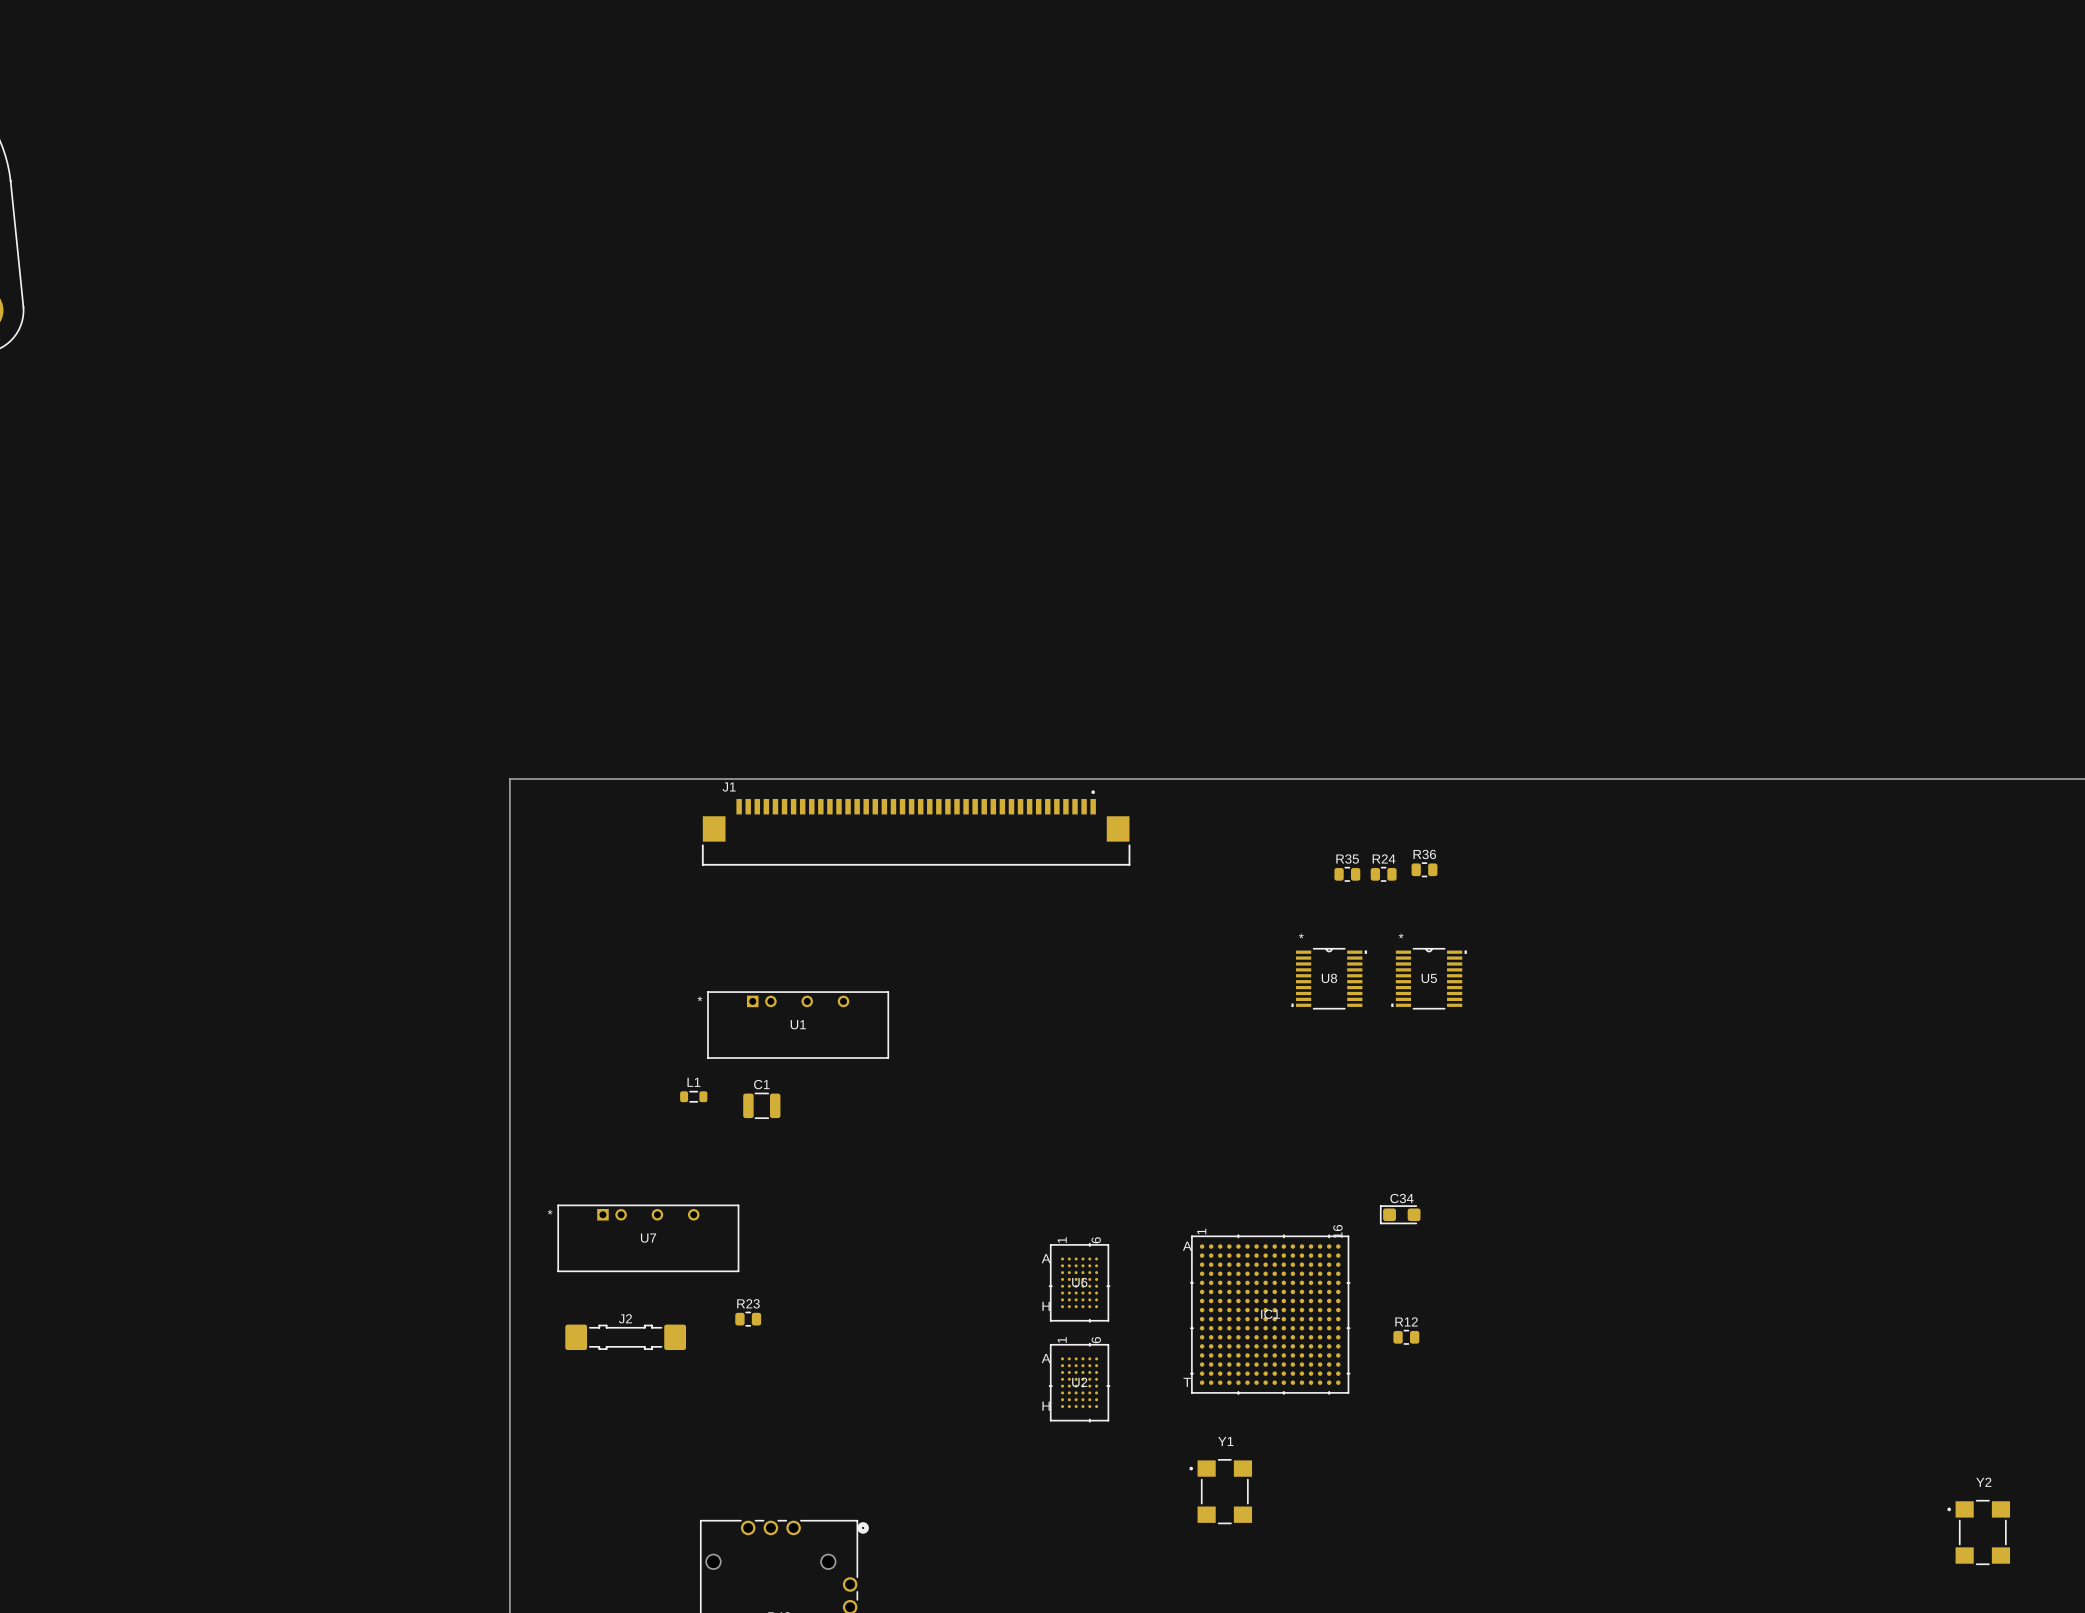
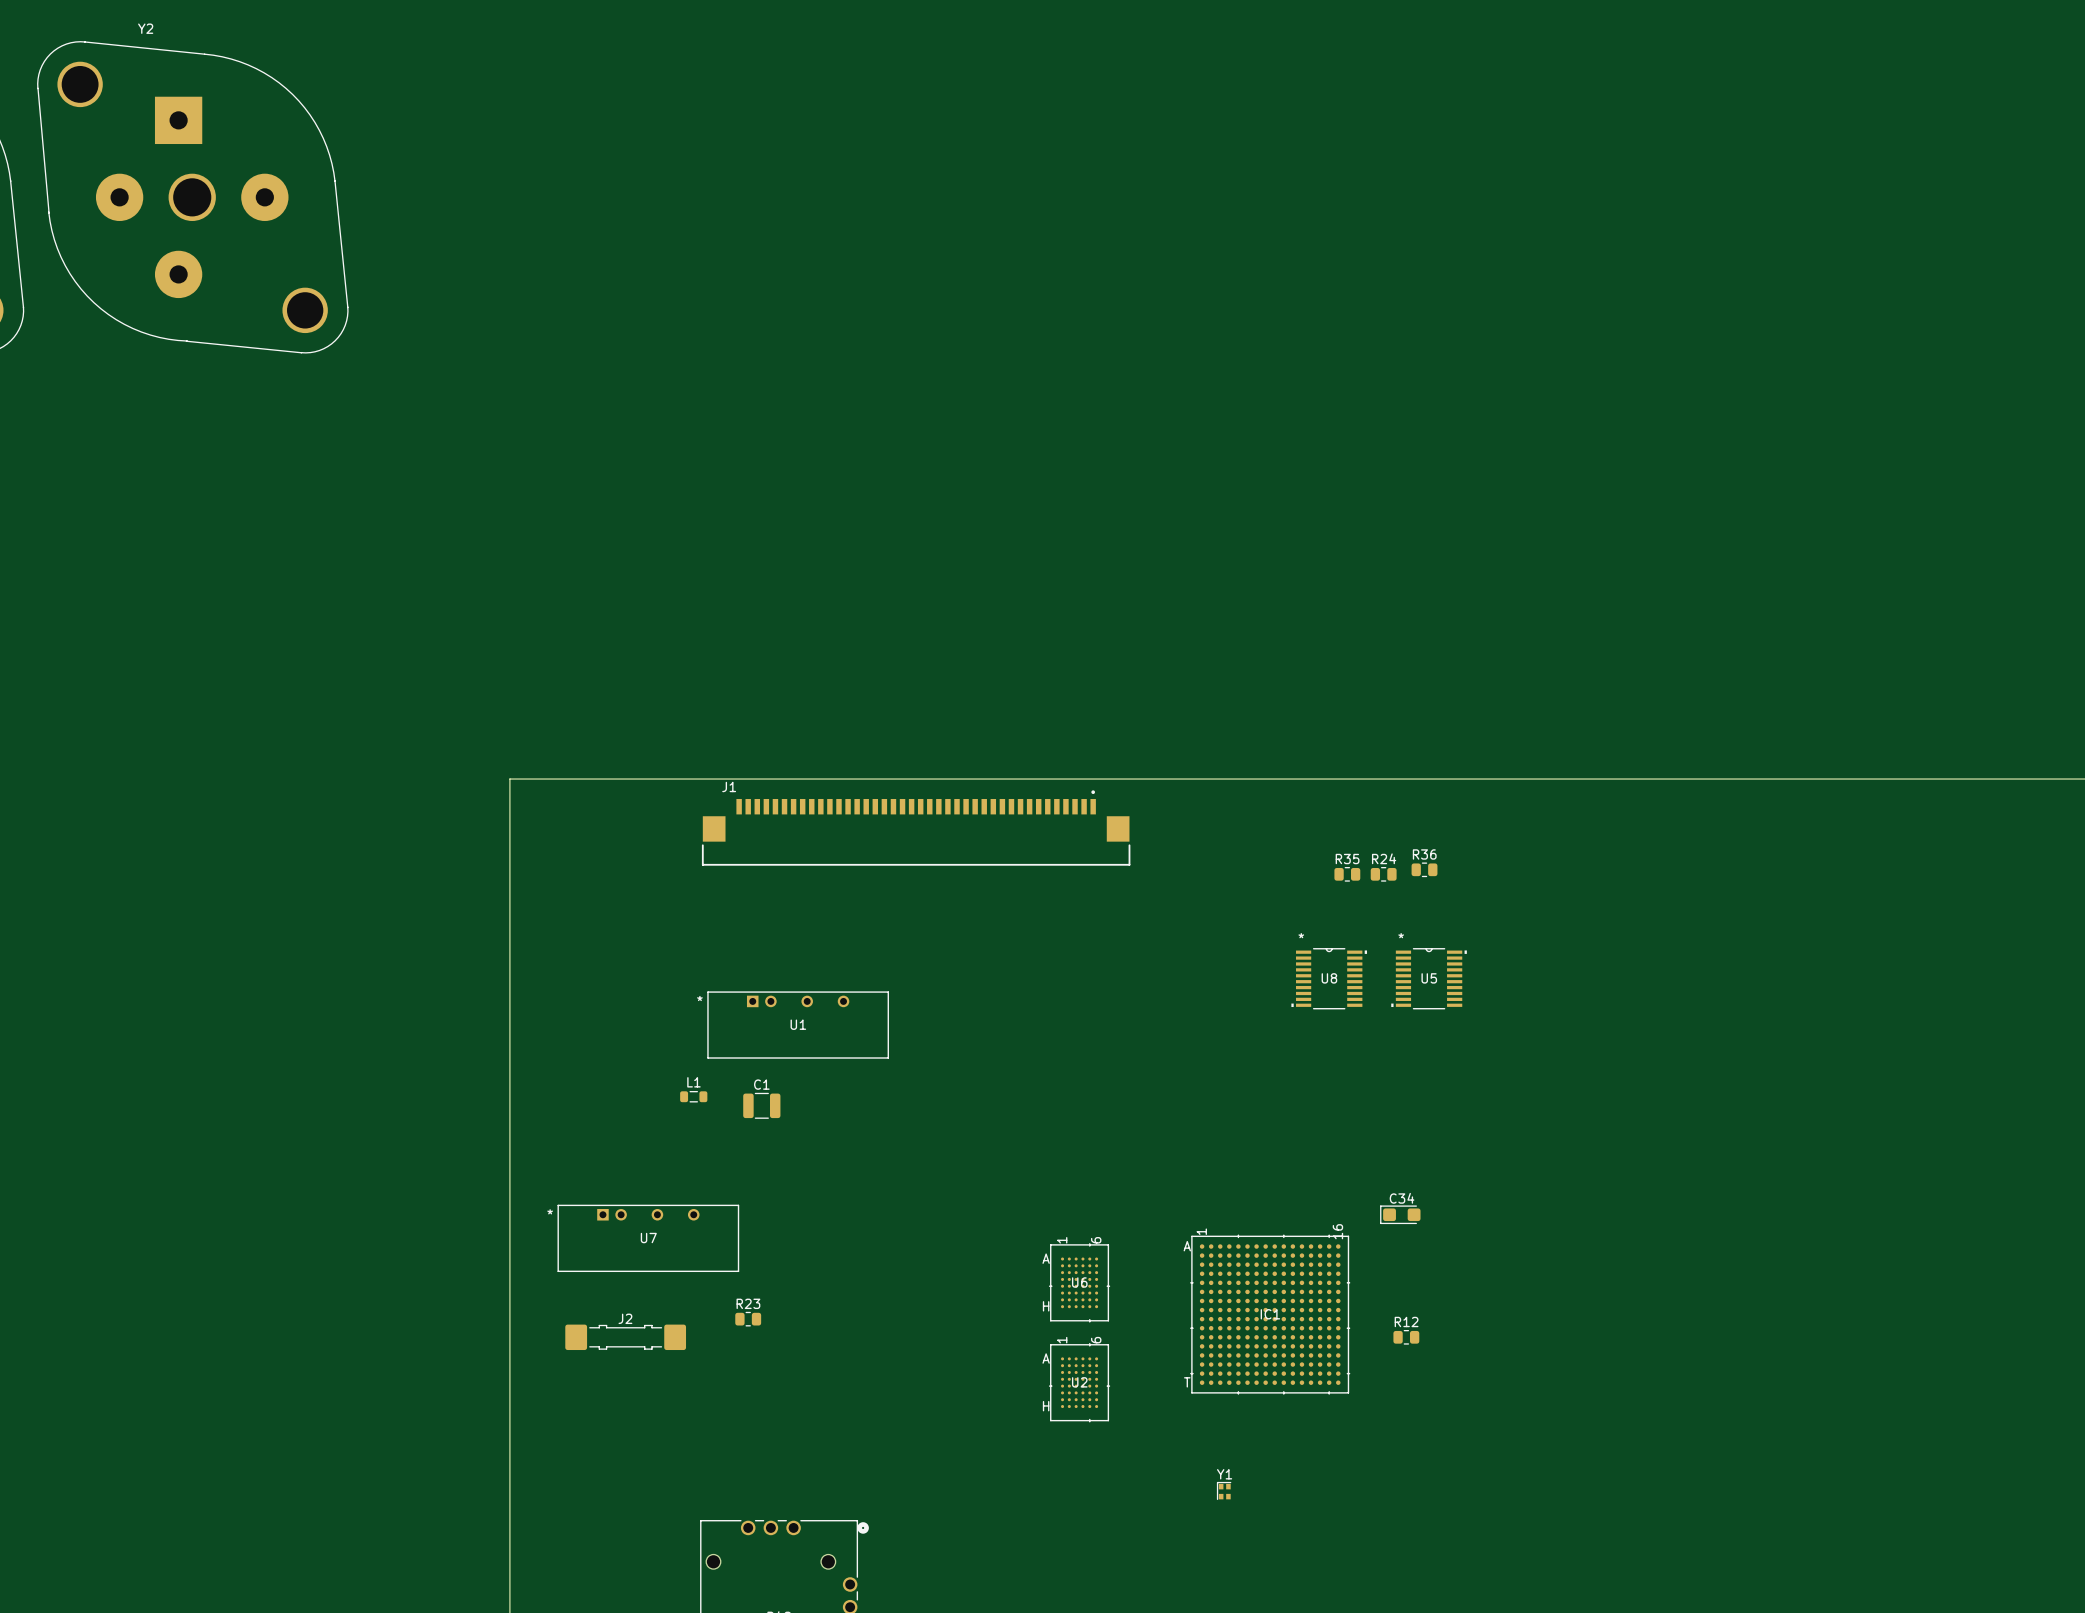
Y1 name position: Y1 (1225, 1441) -> Y1 (1224, 1474)
Y1 footprint: [1189, 1459, 1253, 1524] -> [1216, 1482, 1232, 1500]
Y2 name position: Y2 (1983, 1482) -> Y2 (145, 28)
Y2 footprint: [1947, 1500, 2011, 1565] -> [37, 41, 349, 354]

